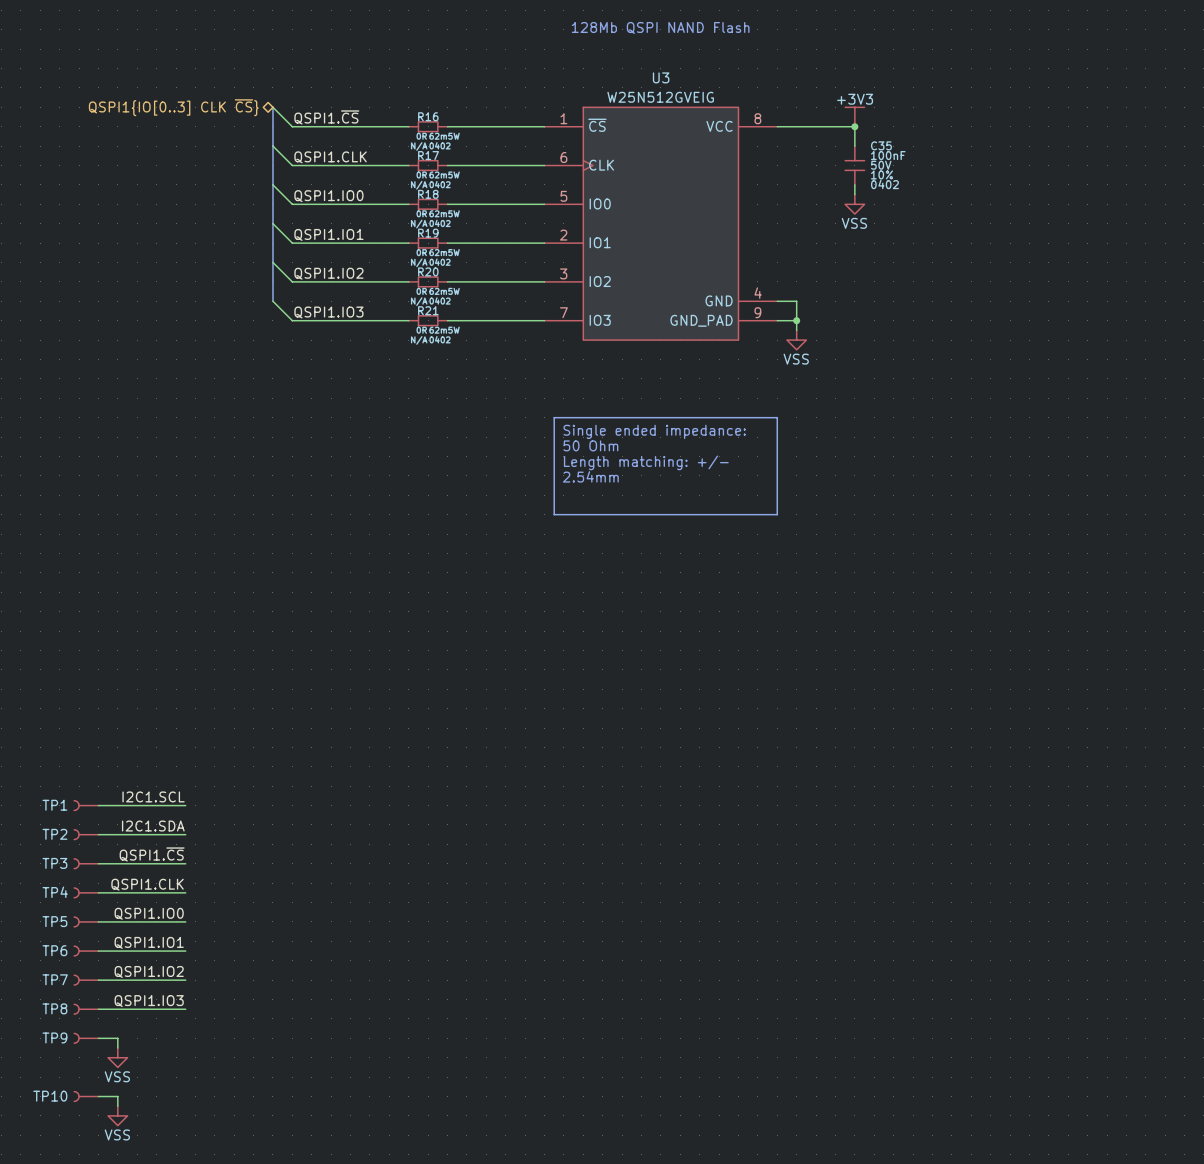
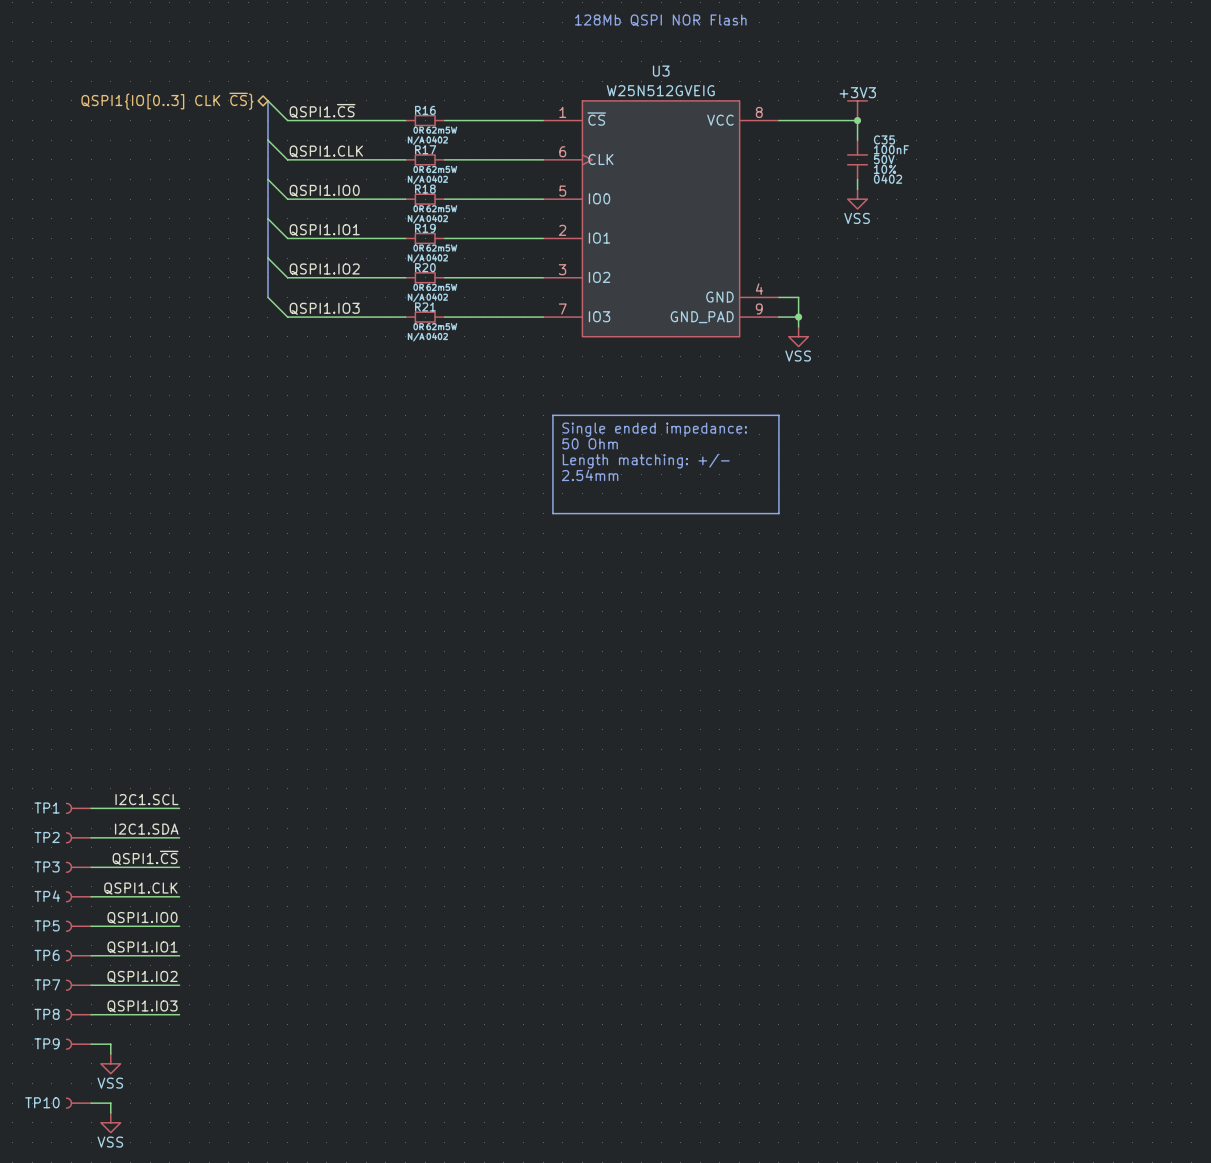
text: 128Mb QSPI NAND Flash (660, 27) -> 128Mb QSPI NOR Flash (660, 20)

